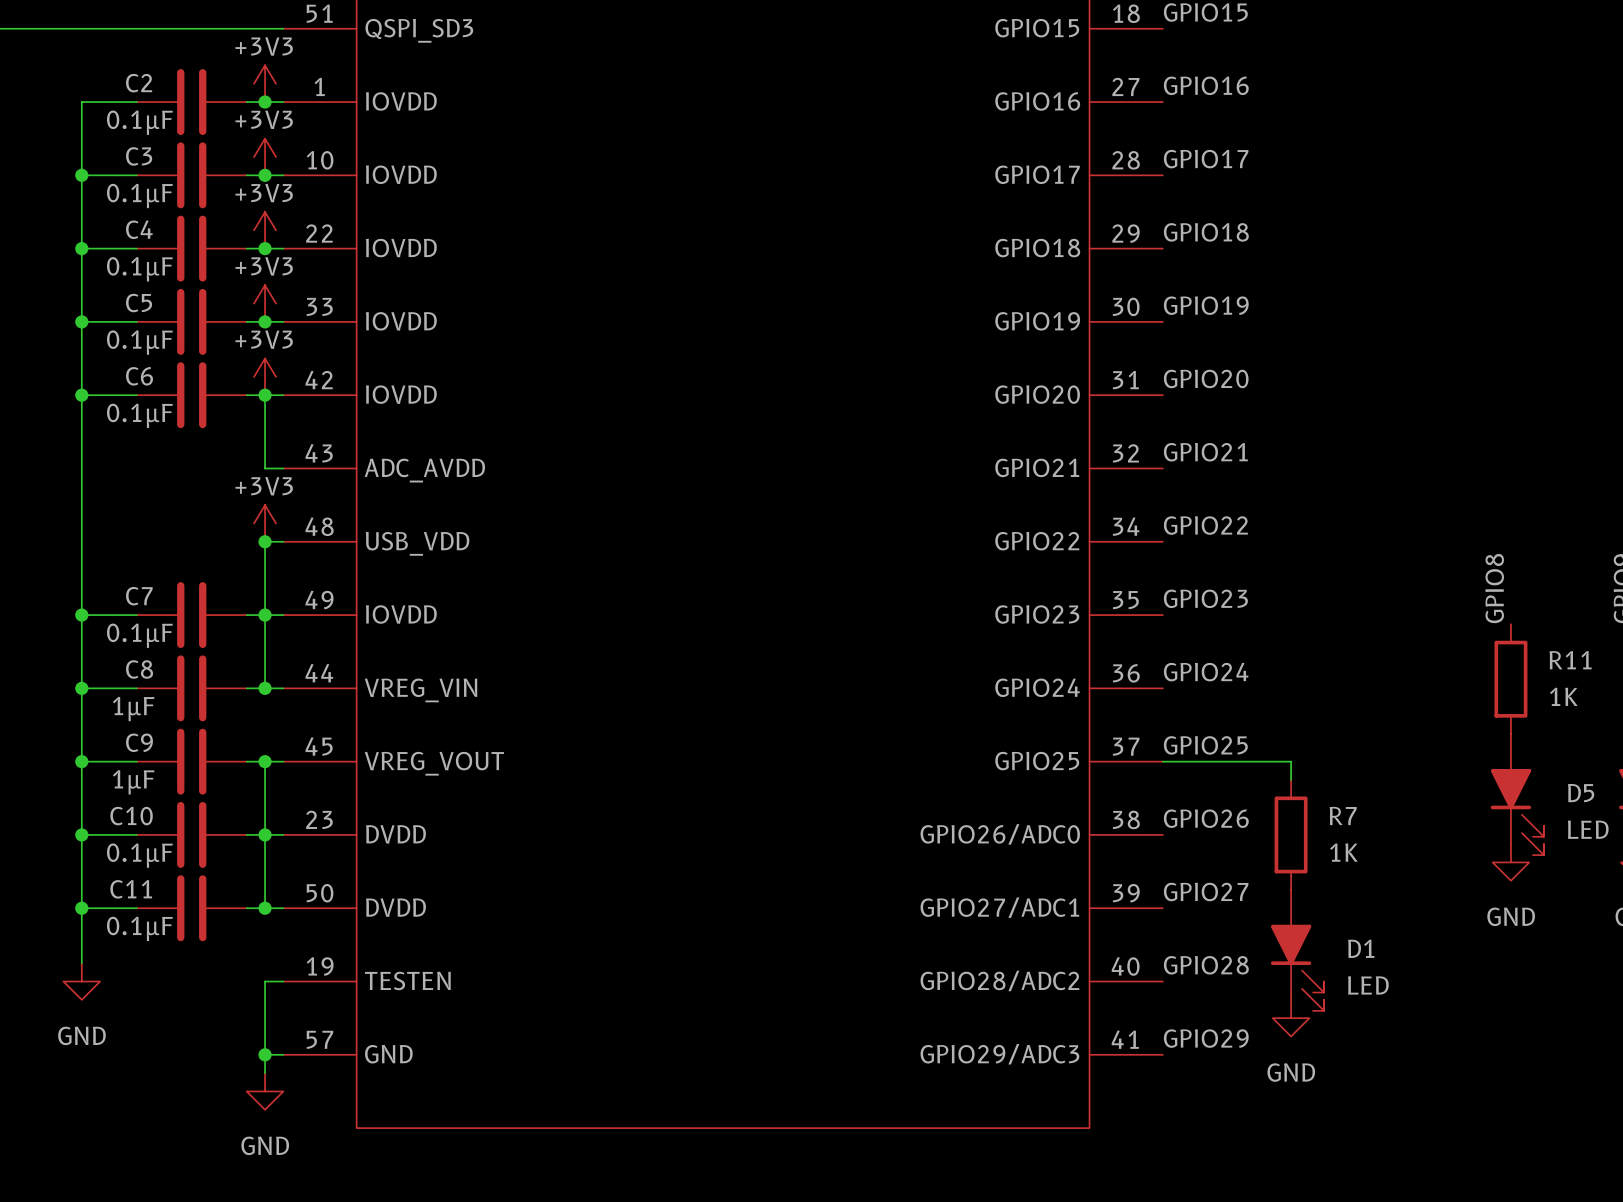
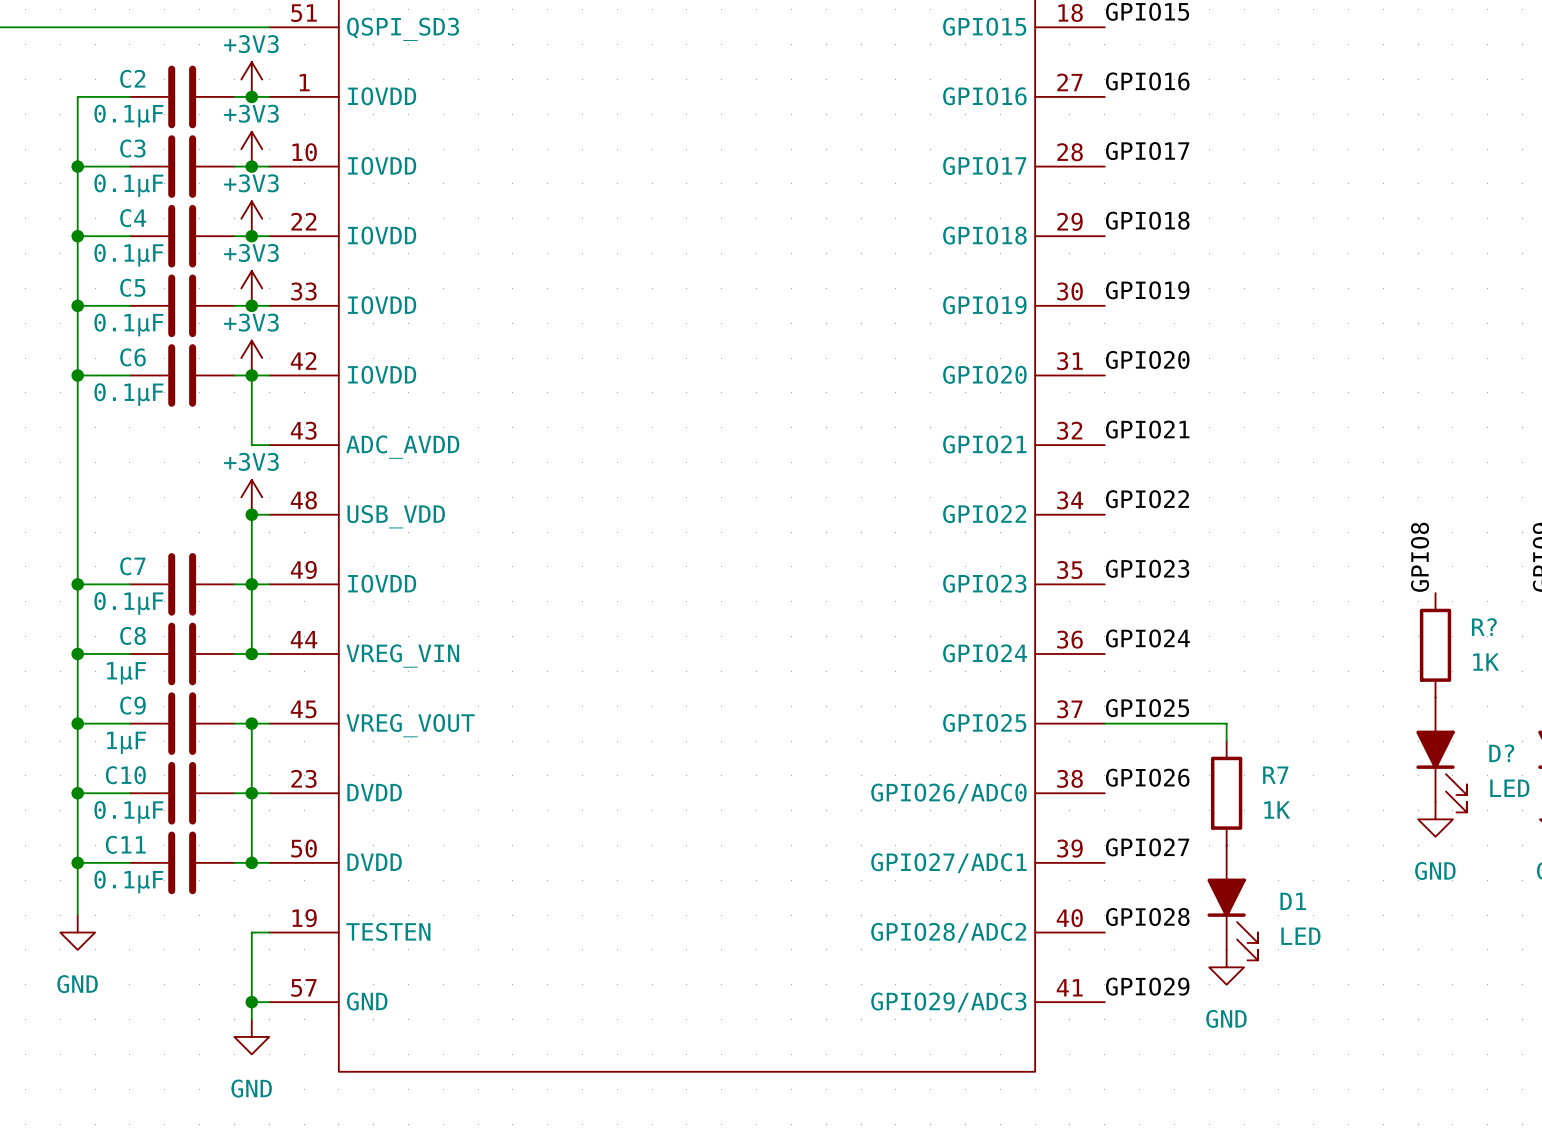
R11 name: R11 (1570, 660) -> R? (1484, 627)
D5 name: D5 (1581, 793) -> D? (1501, 753)

